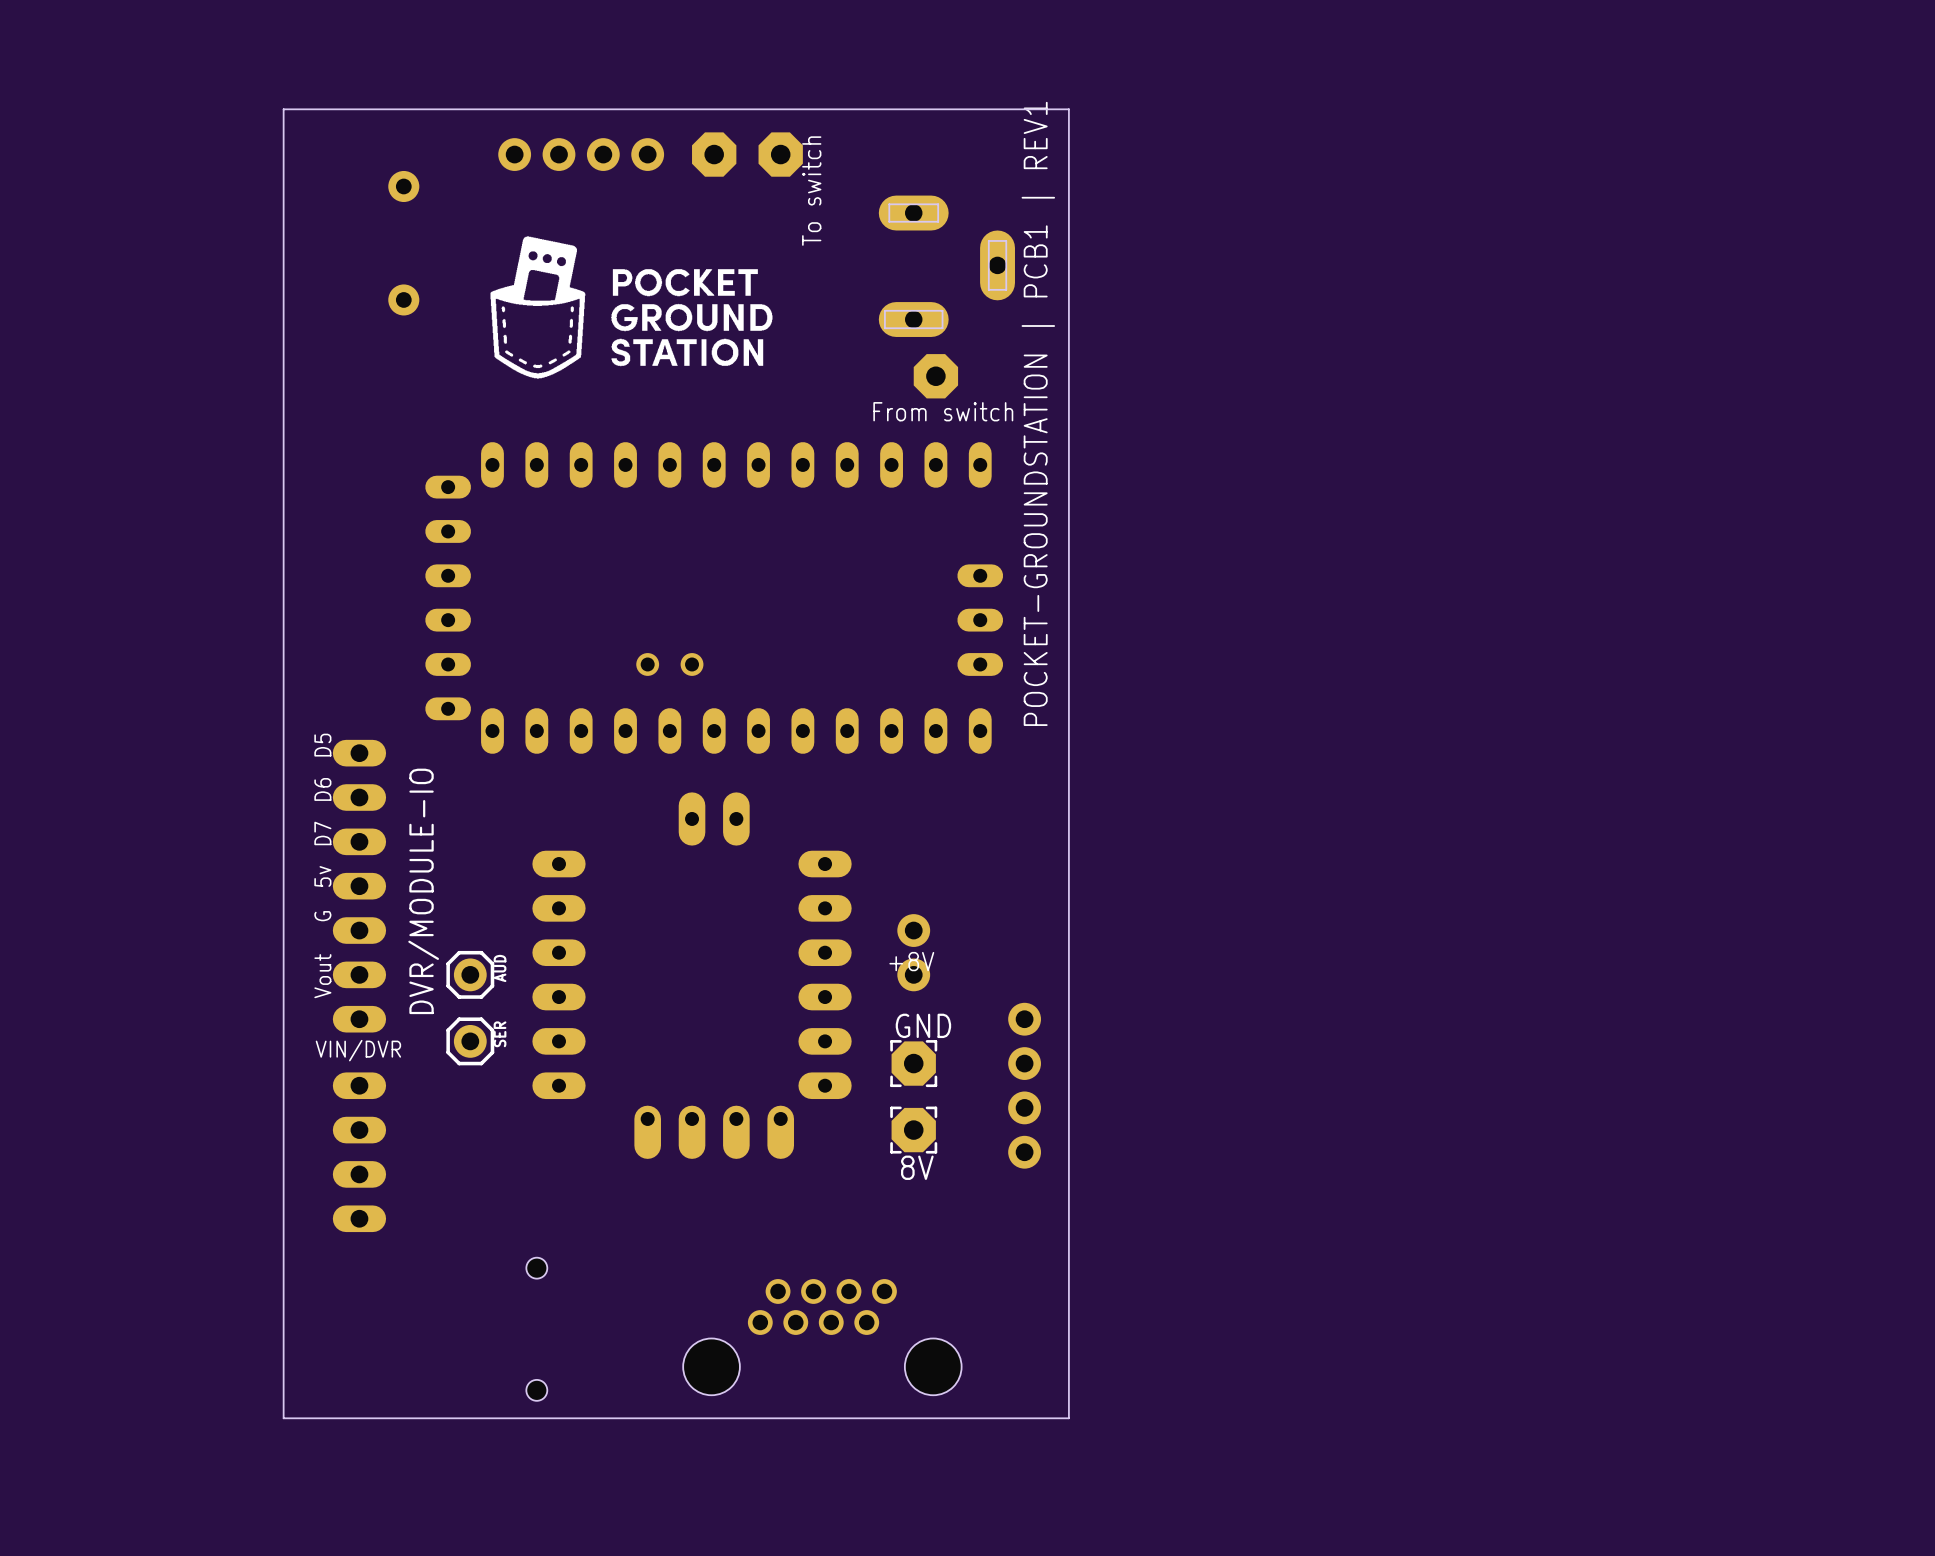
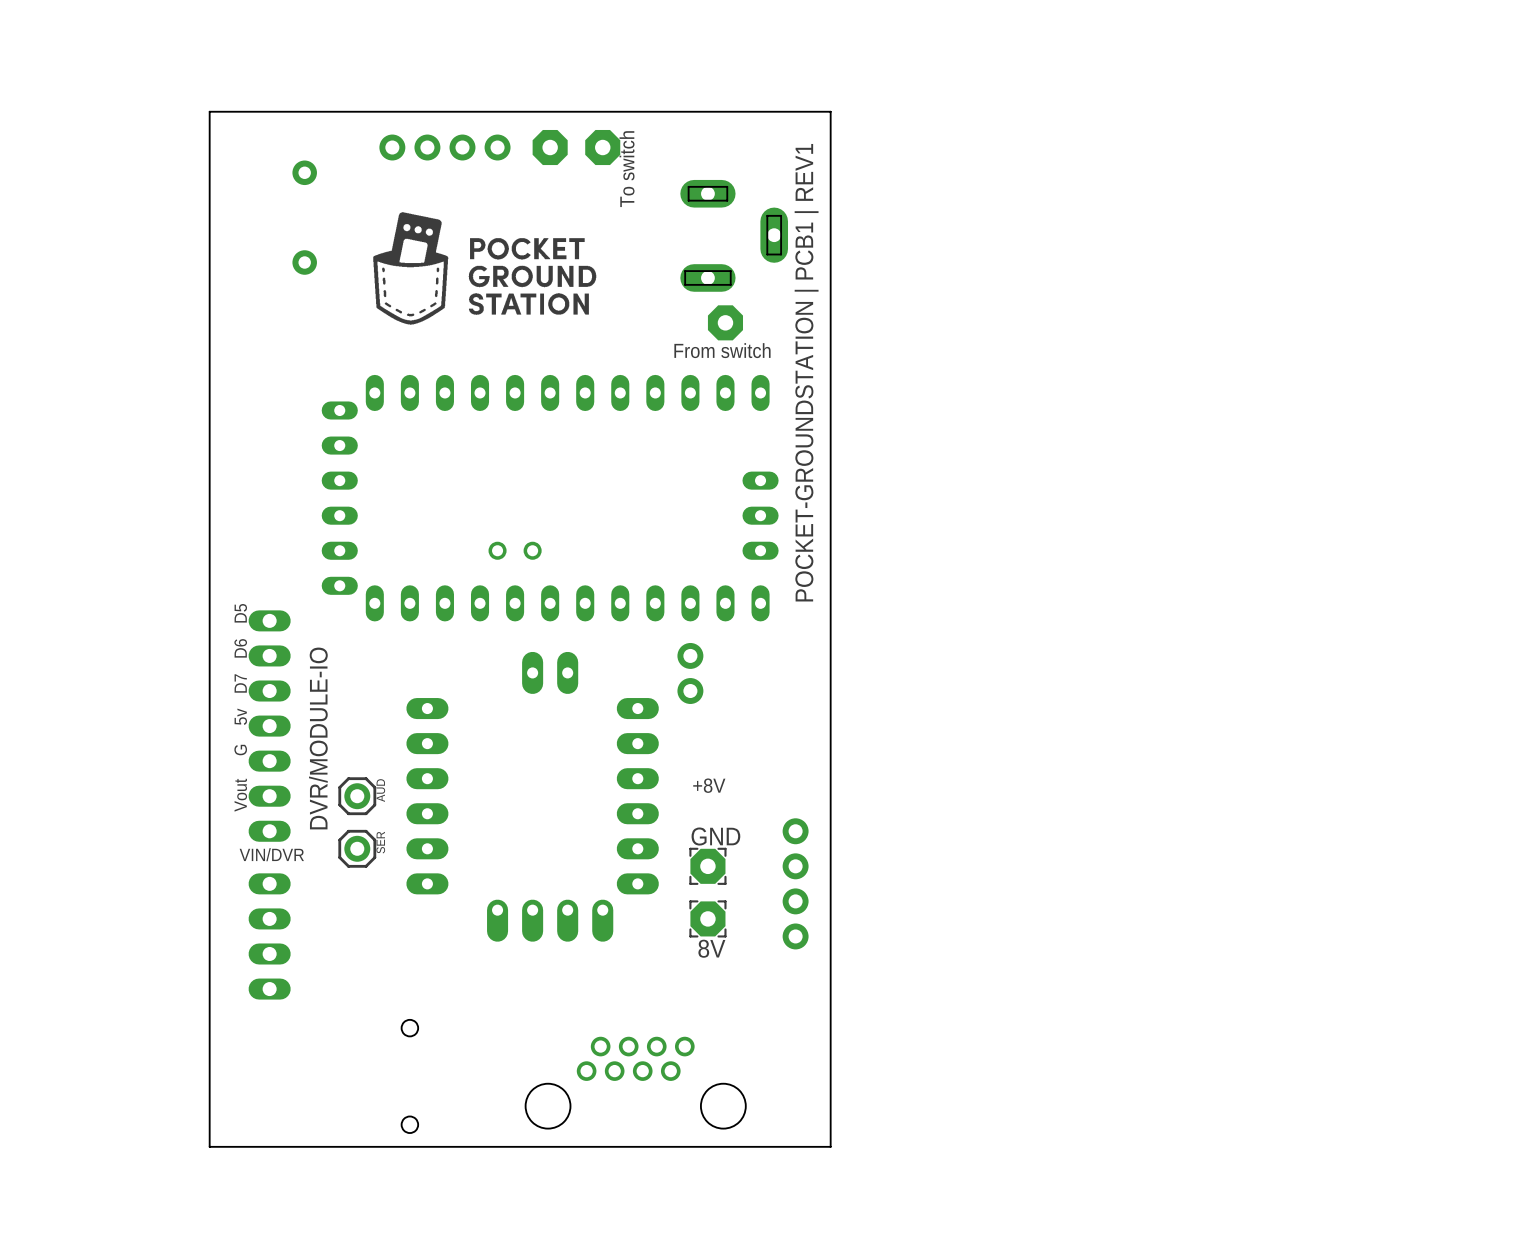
part position: (913, 952) -> (690, 673)

